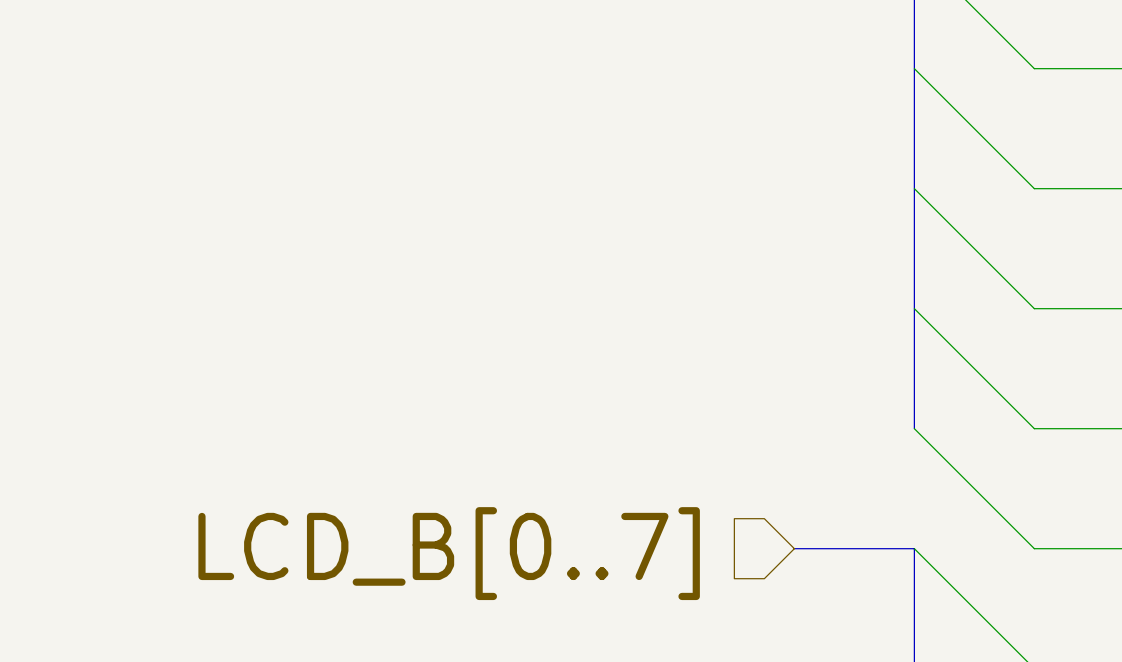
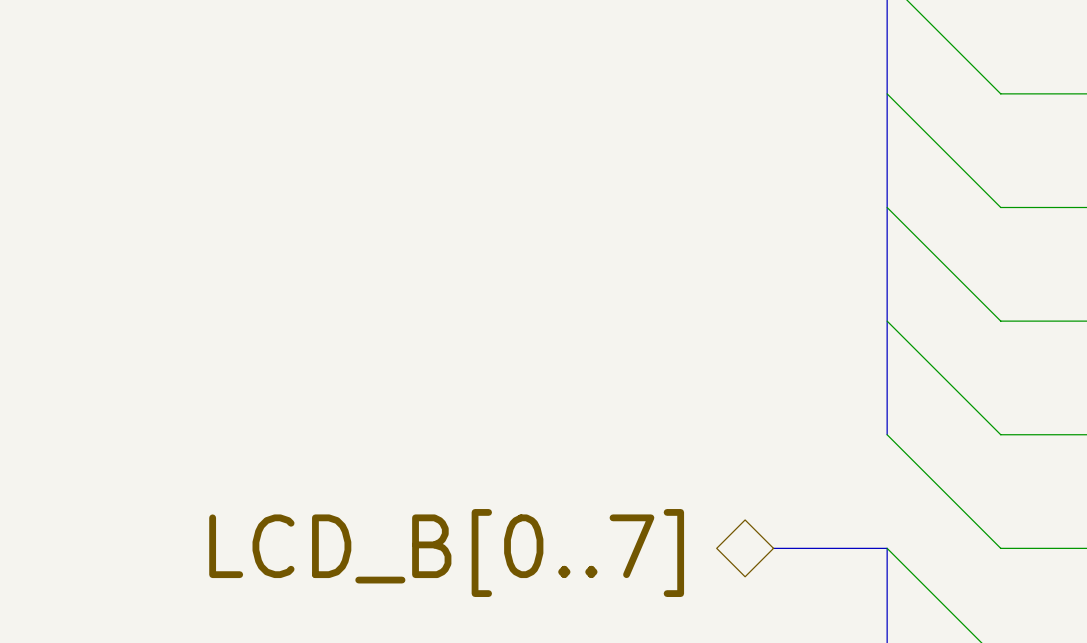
hierarchical label shape: input (449, 553) -> bidirectional (446, 553)

